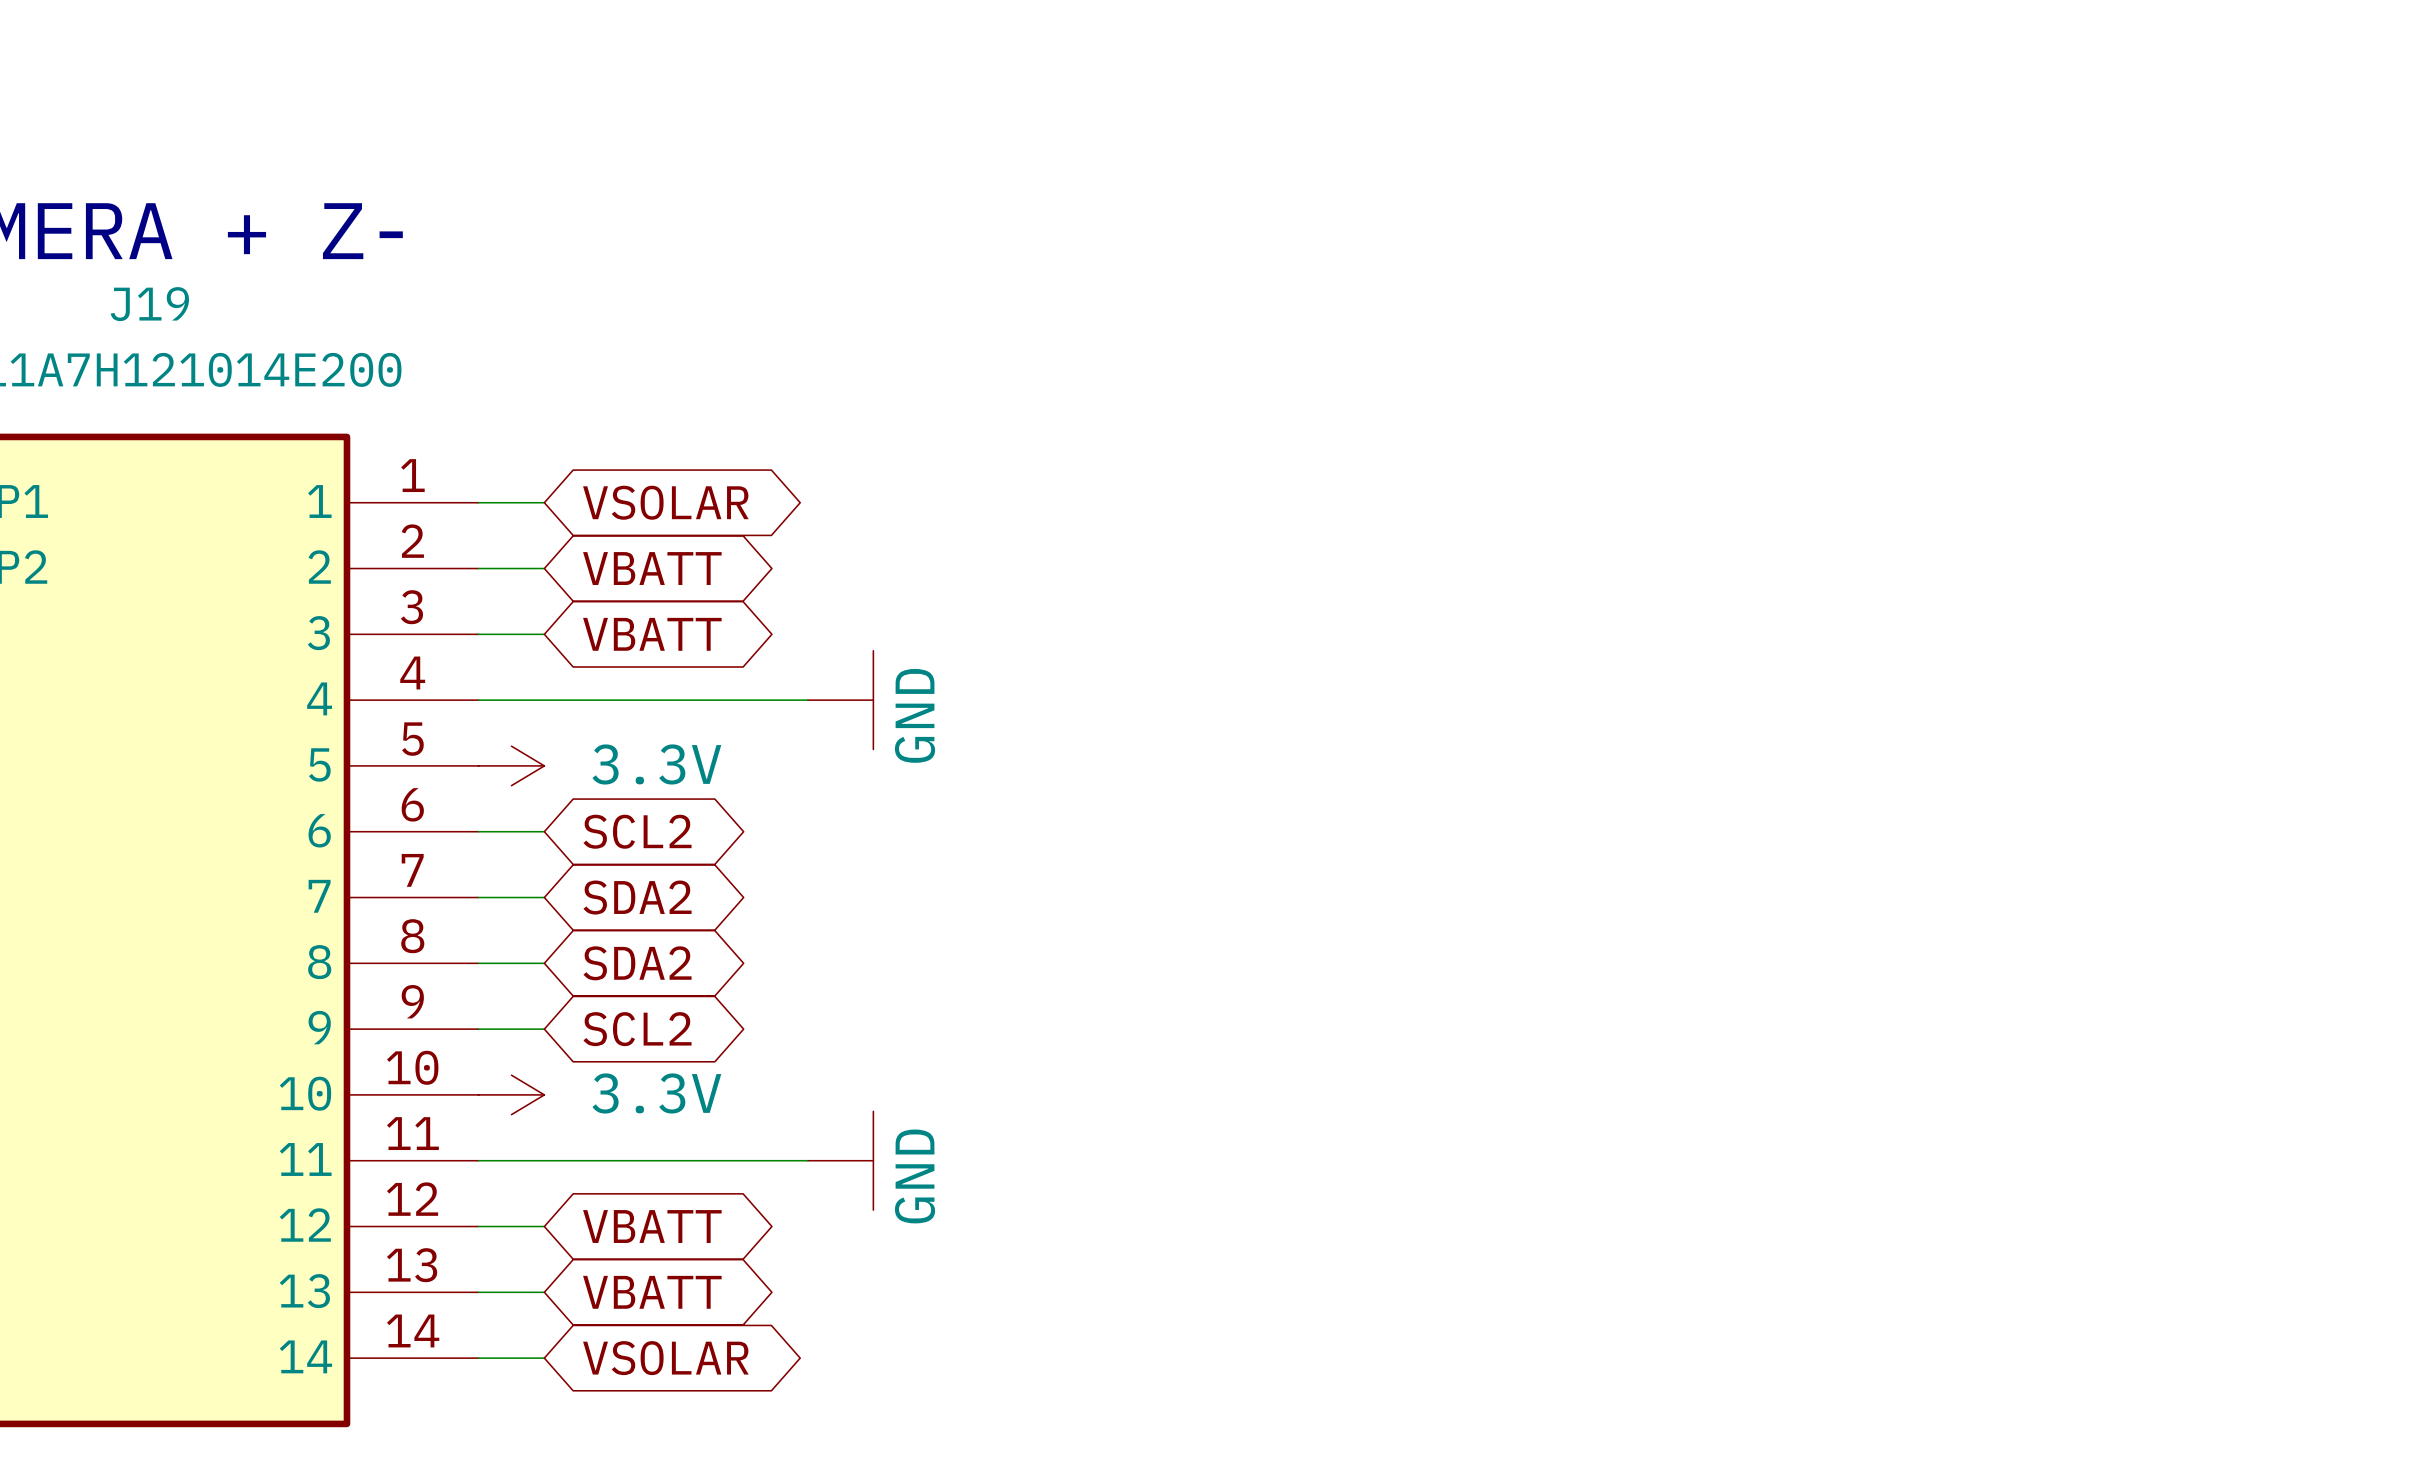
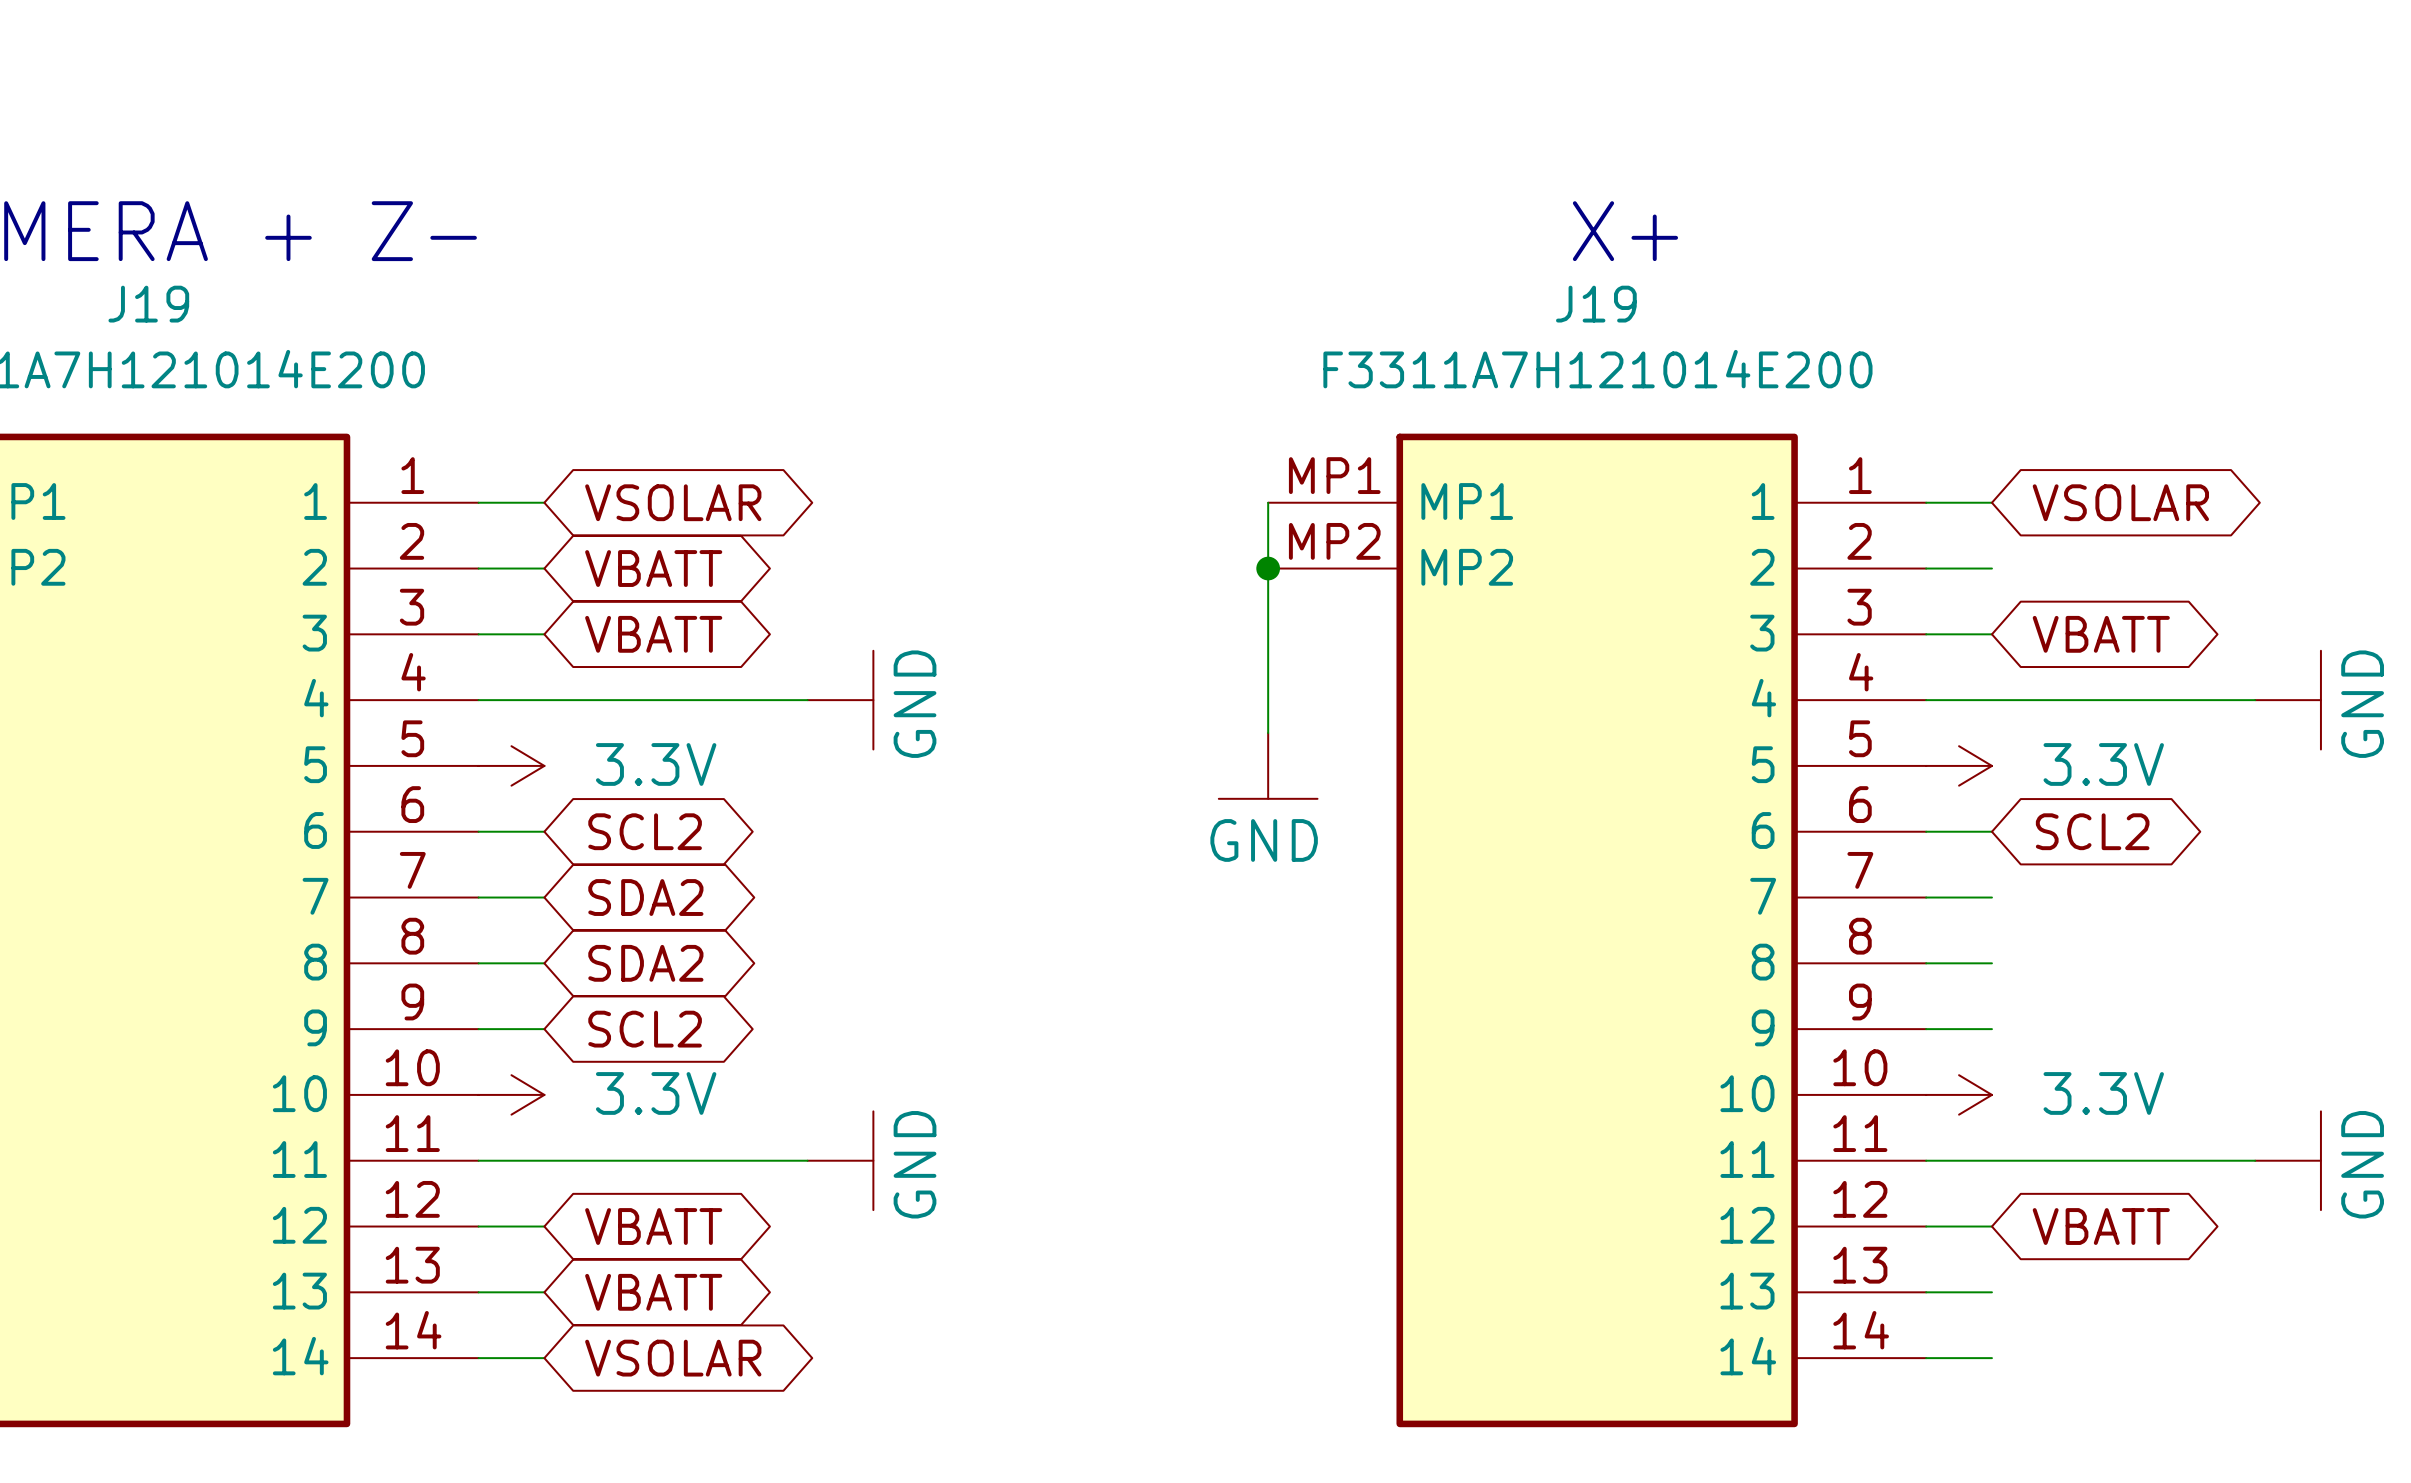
text: none -> X+ (1625, 231)
wire: none -> (1268, 502) (1268, 733)
wire: none -> (1926, 502) (1991, 502)
global label: none -> VSOLAR (2120, 502)
junction: none -> (1268, 568)
wire: none -> (1926, 568) (1991, 568)
wire: none -> (1926, 634) (1991, 634)
global label: none -> VBATT (2101, 634)
wire: none -> (1926, 700) (2255, 700)
power symbol: none -> GND (2288, 700)
power symbol: none -> GND (1268, 765)
power symbol: none -> 3.3V (1959, 765)
wire: none -> (1926, 831) (1991, 831)
global label: none -> SCL2 (2092, 831)
wire: none -> (1926, 897) (1991, 897)
J19: none -> F3311A7H121014E200 (1597, 930)
wire: none -> (1926, 963) (1991, 963)
wire: none -> (1926, 1029) (1991, 1029)
power symbol: none -> 3.3V (1959, 1094)
wire: none -> (1926, 1160) (2255, 1160)
power symbol: none -> GND (2288, 1160)
wire: none -> (1926, 1226) (1991, 1226)
global label: none -> VBATT (2101, 1226)
wire: none -> (1926, 1292) (1991, 1292)
wire: none -> (1926, 1358) (1991, 1358)

